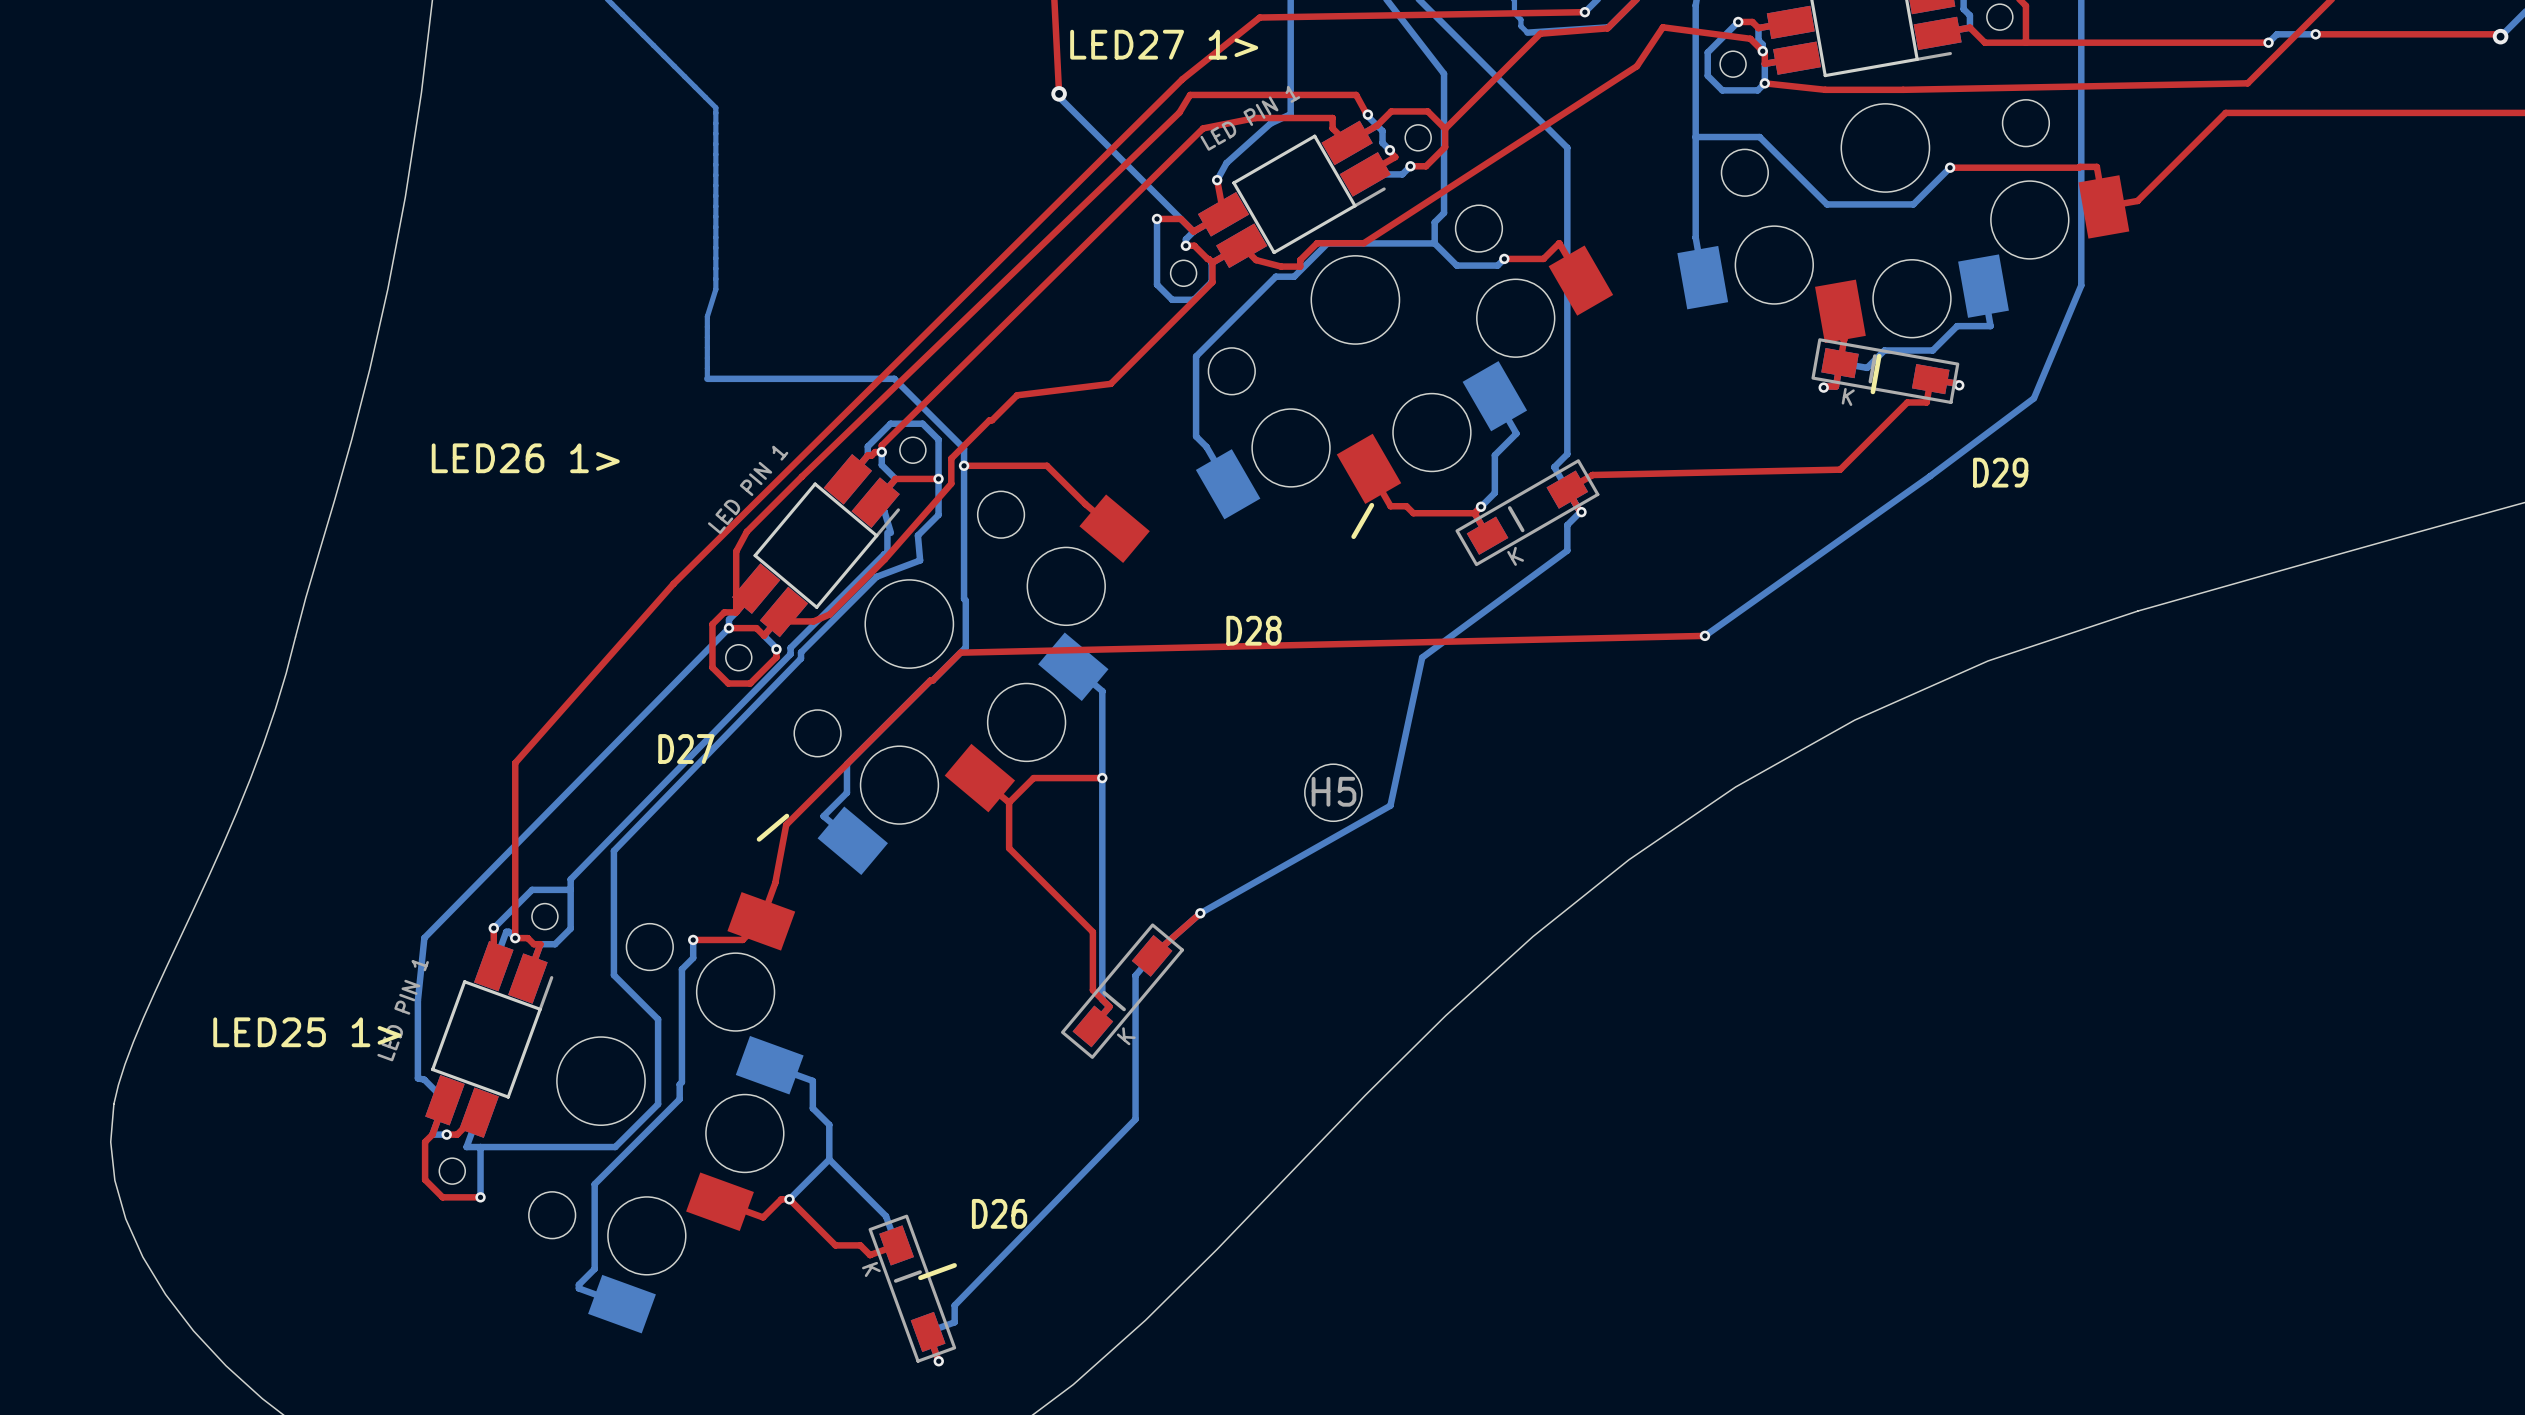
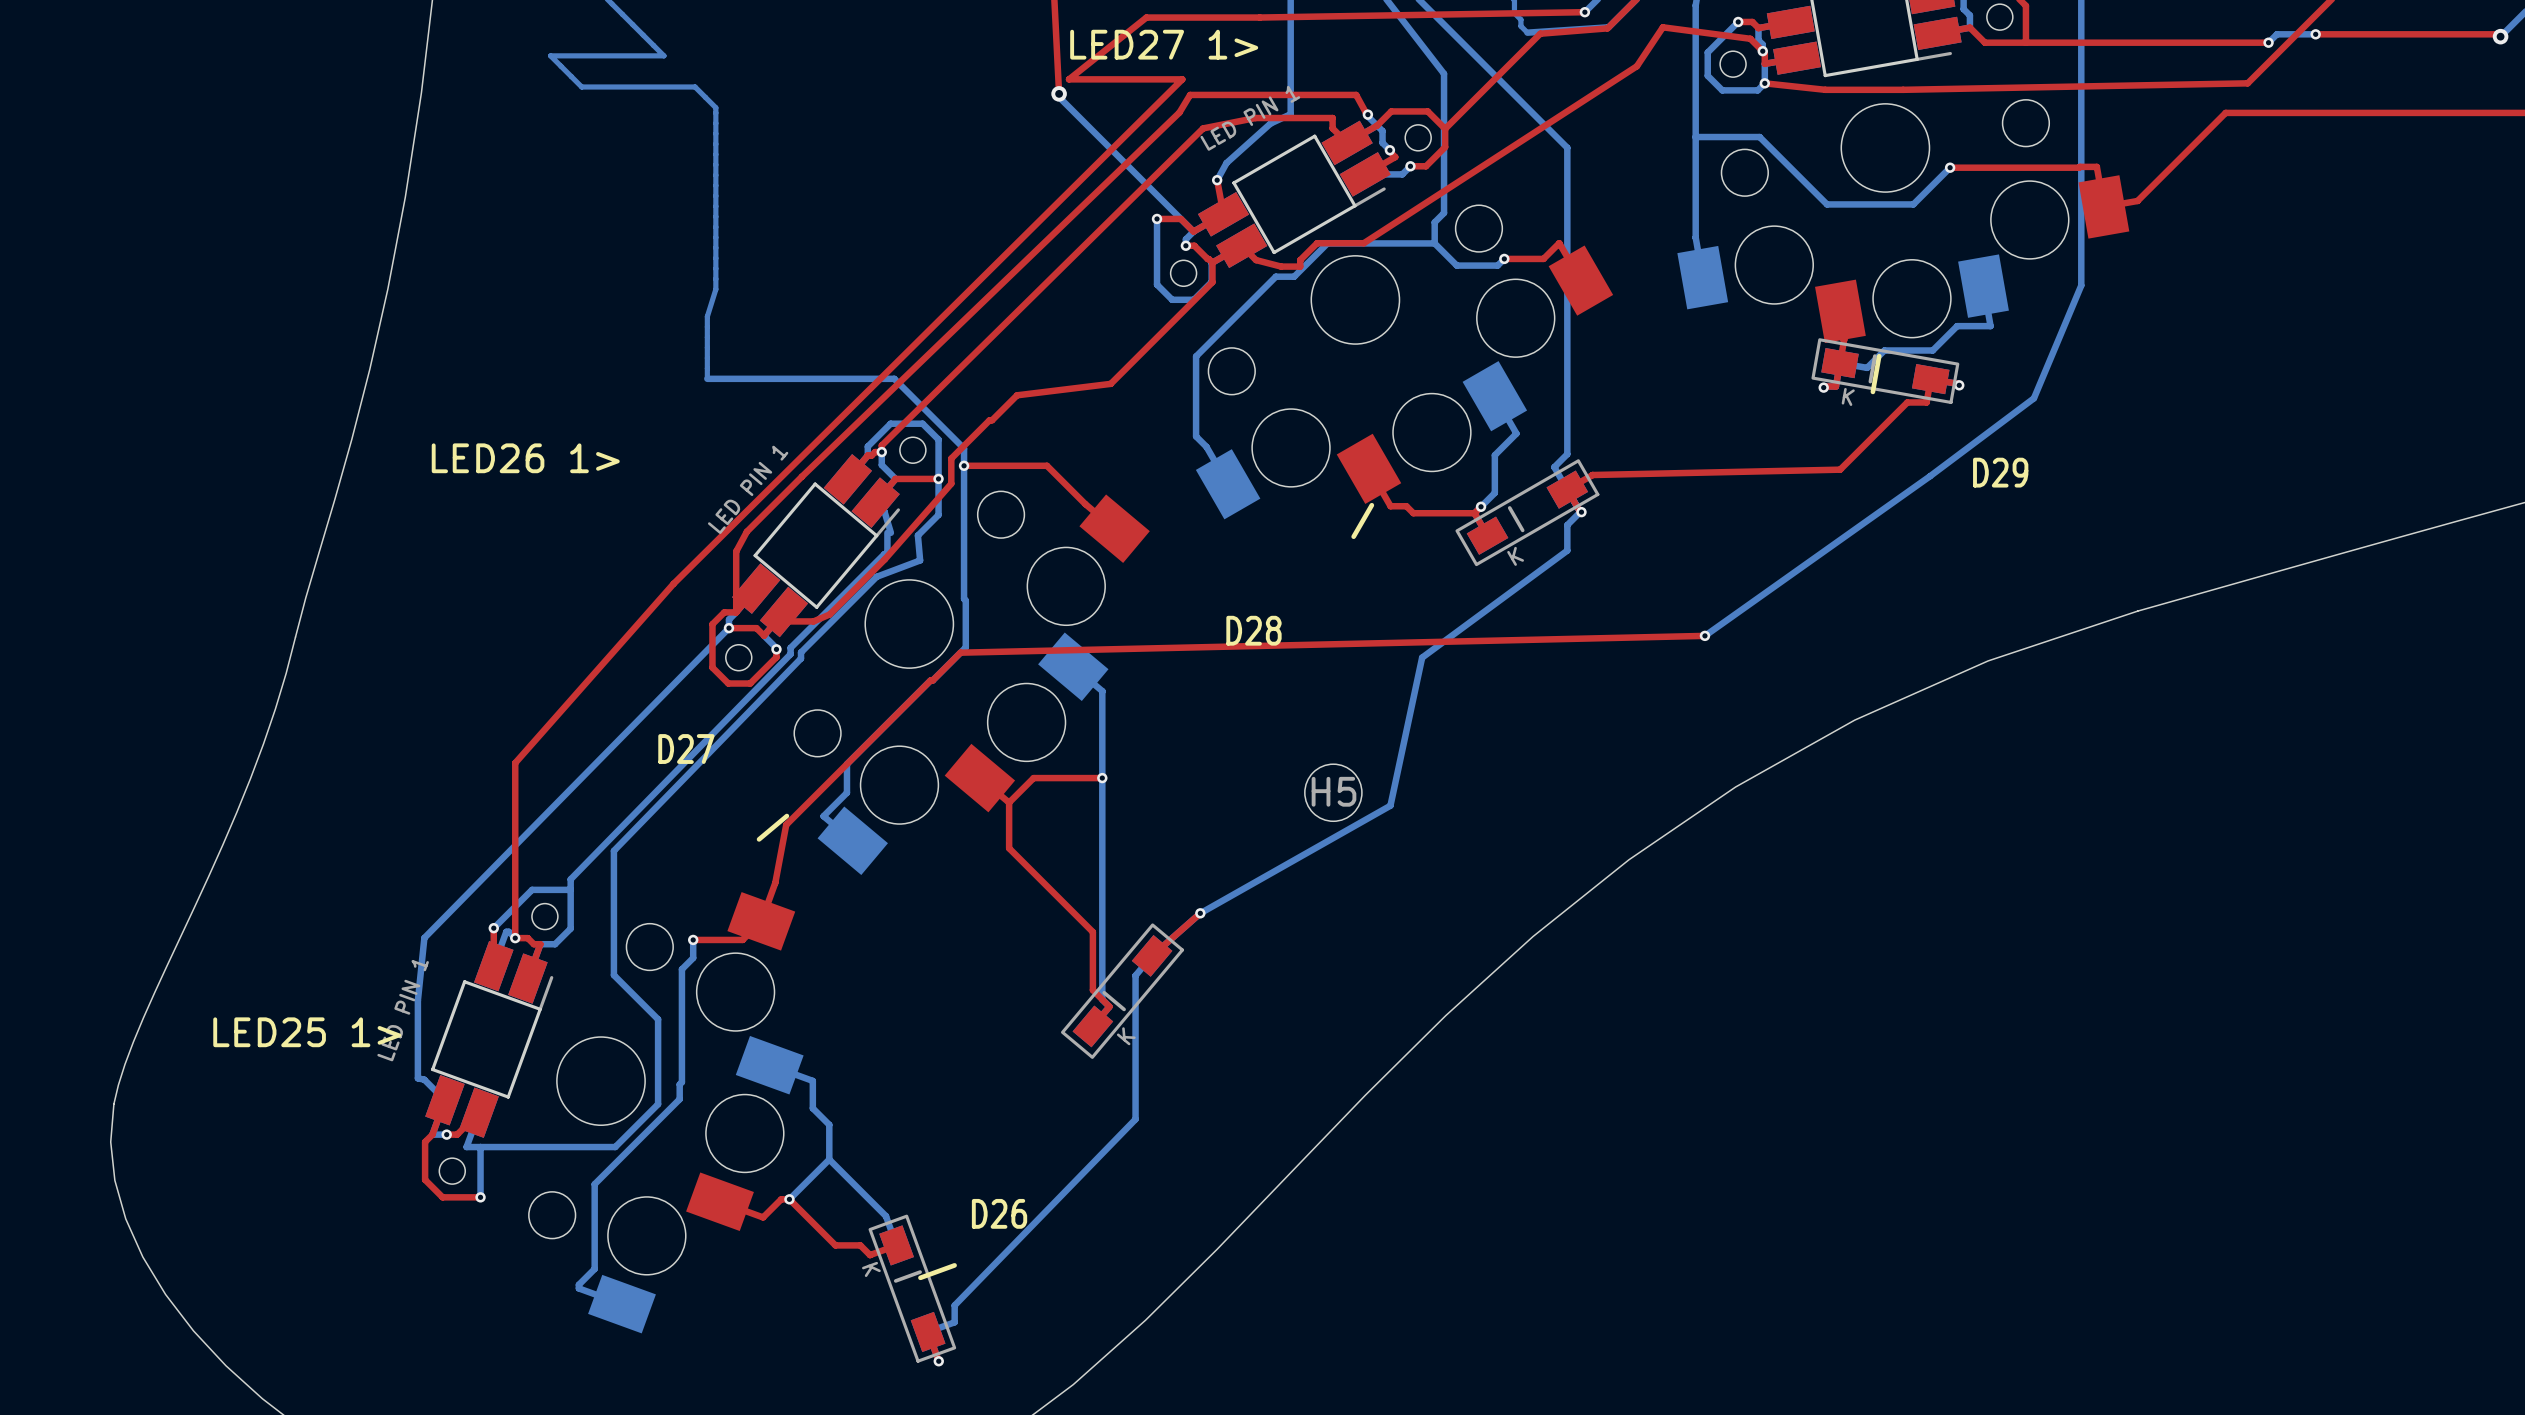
top track: (1259, 17) (1182, 79) -> (1259, 17) (1146, 17) (1069, 79) (1182, 79)
bottom track: (663, 55) (695, 86) -> (663, 55) (550, 55) (581, 86) (695, 86)

